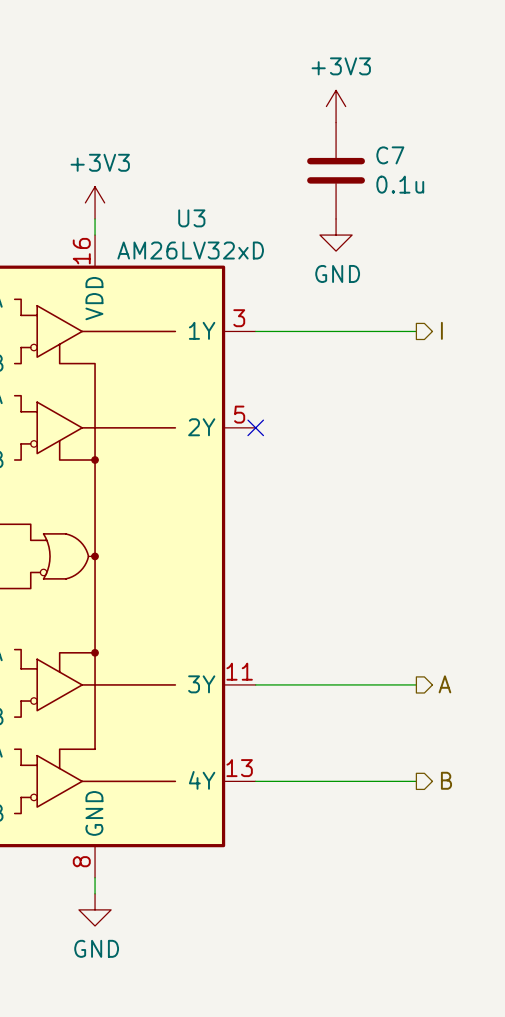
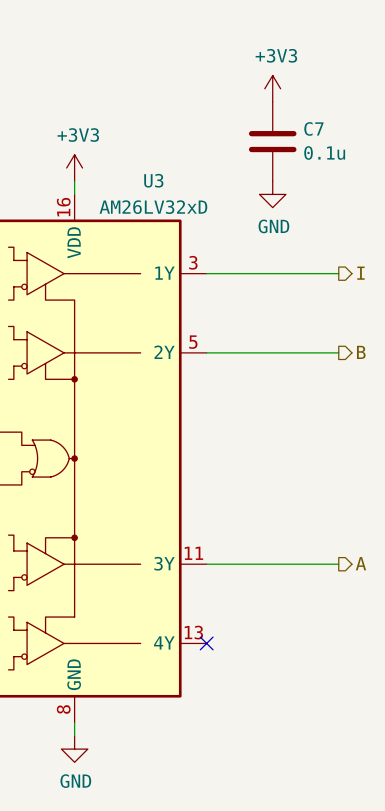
wire: none -> (206, 352) (338, 352)
no-connect mark: (255, 427) -> none
hierarchical label: none -> B (361, 352)
hierarchical label: B (446, 780) -> none
wire: (255, 781) (416, 781) -> none
no-connect mark: none -> (206, 643)

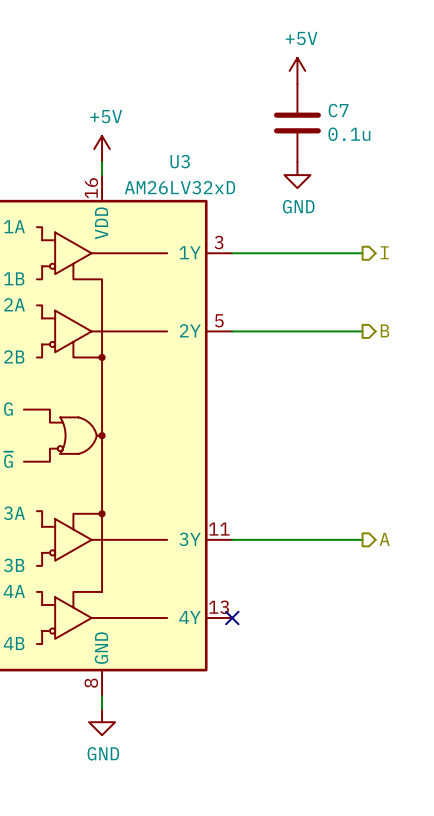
power symbol: +3V3 (272, 88) -> +5V (297, 70)
power symbol: +3V3 (74, 168) -> +5V (102, 149)

